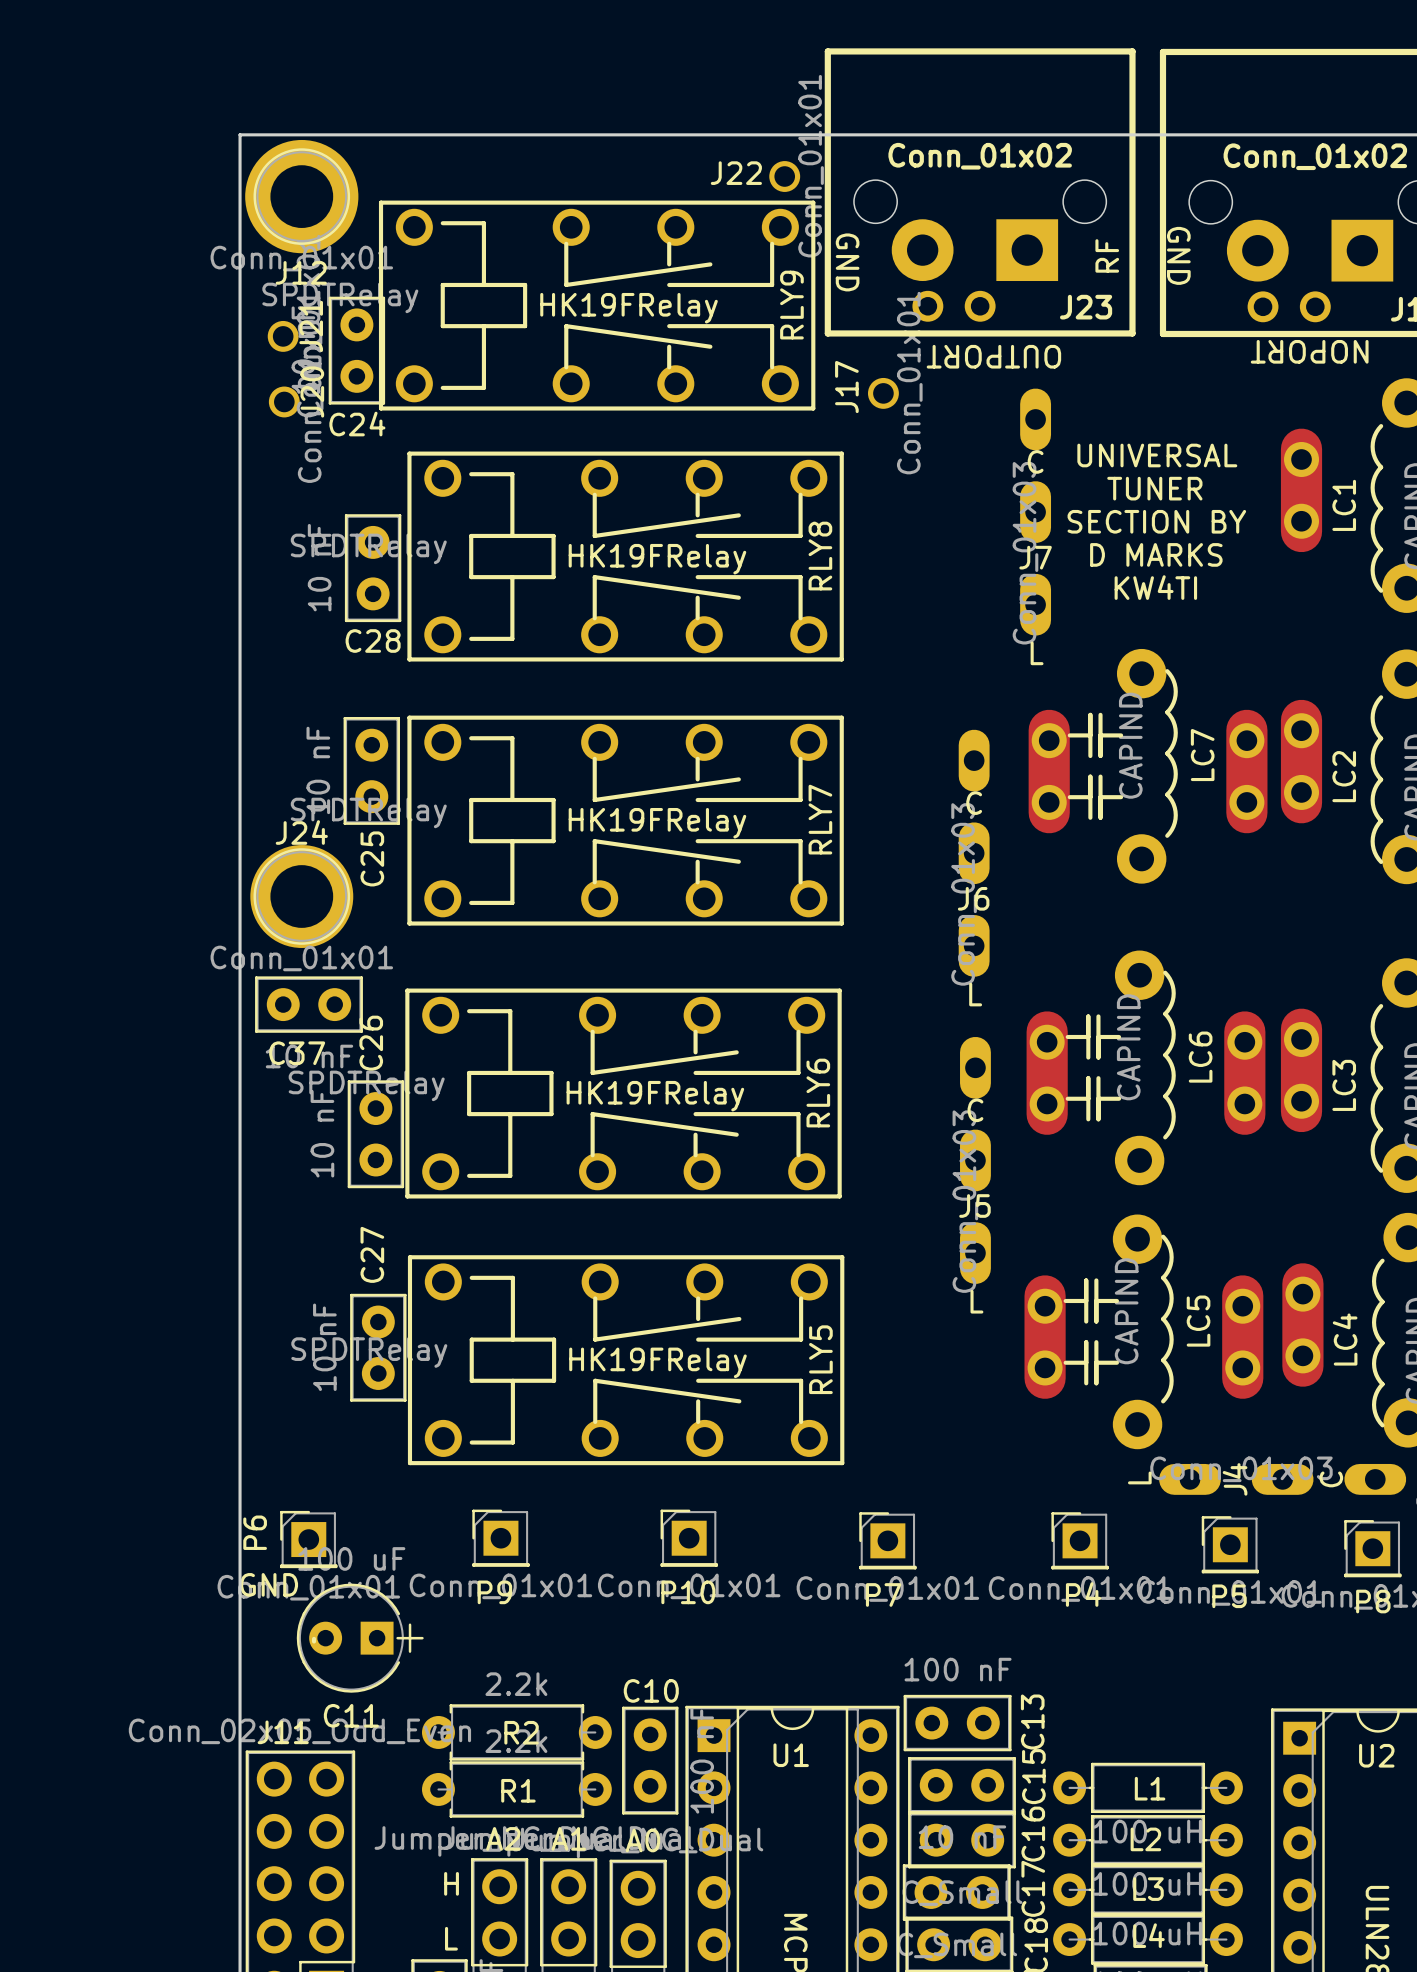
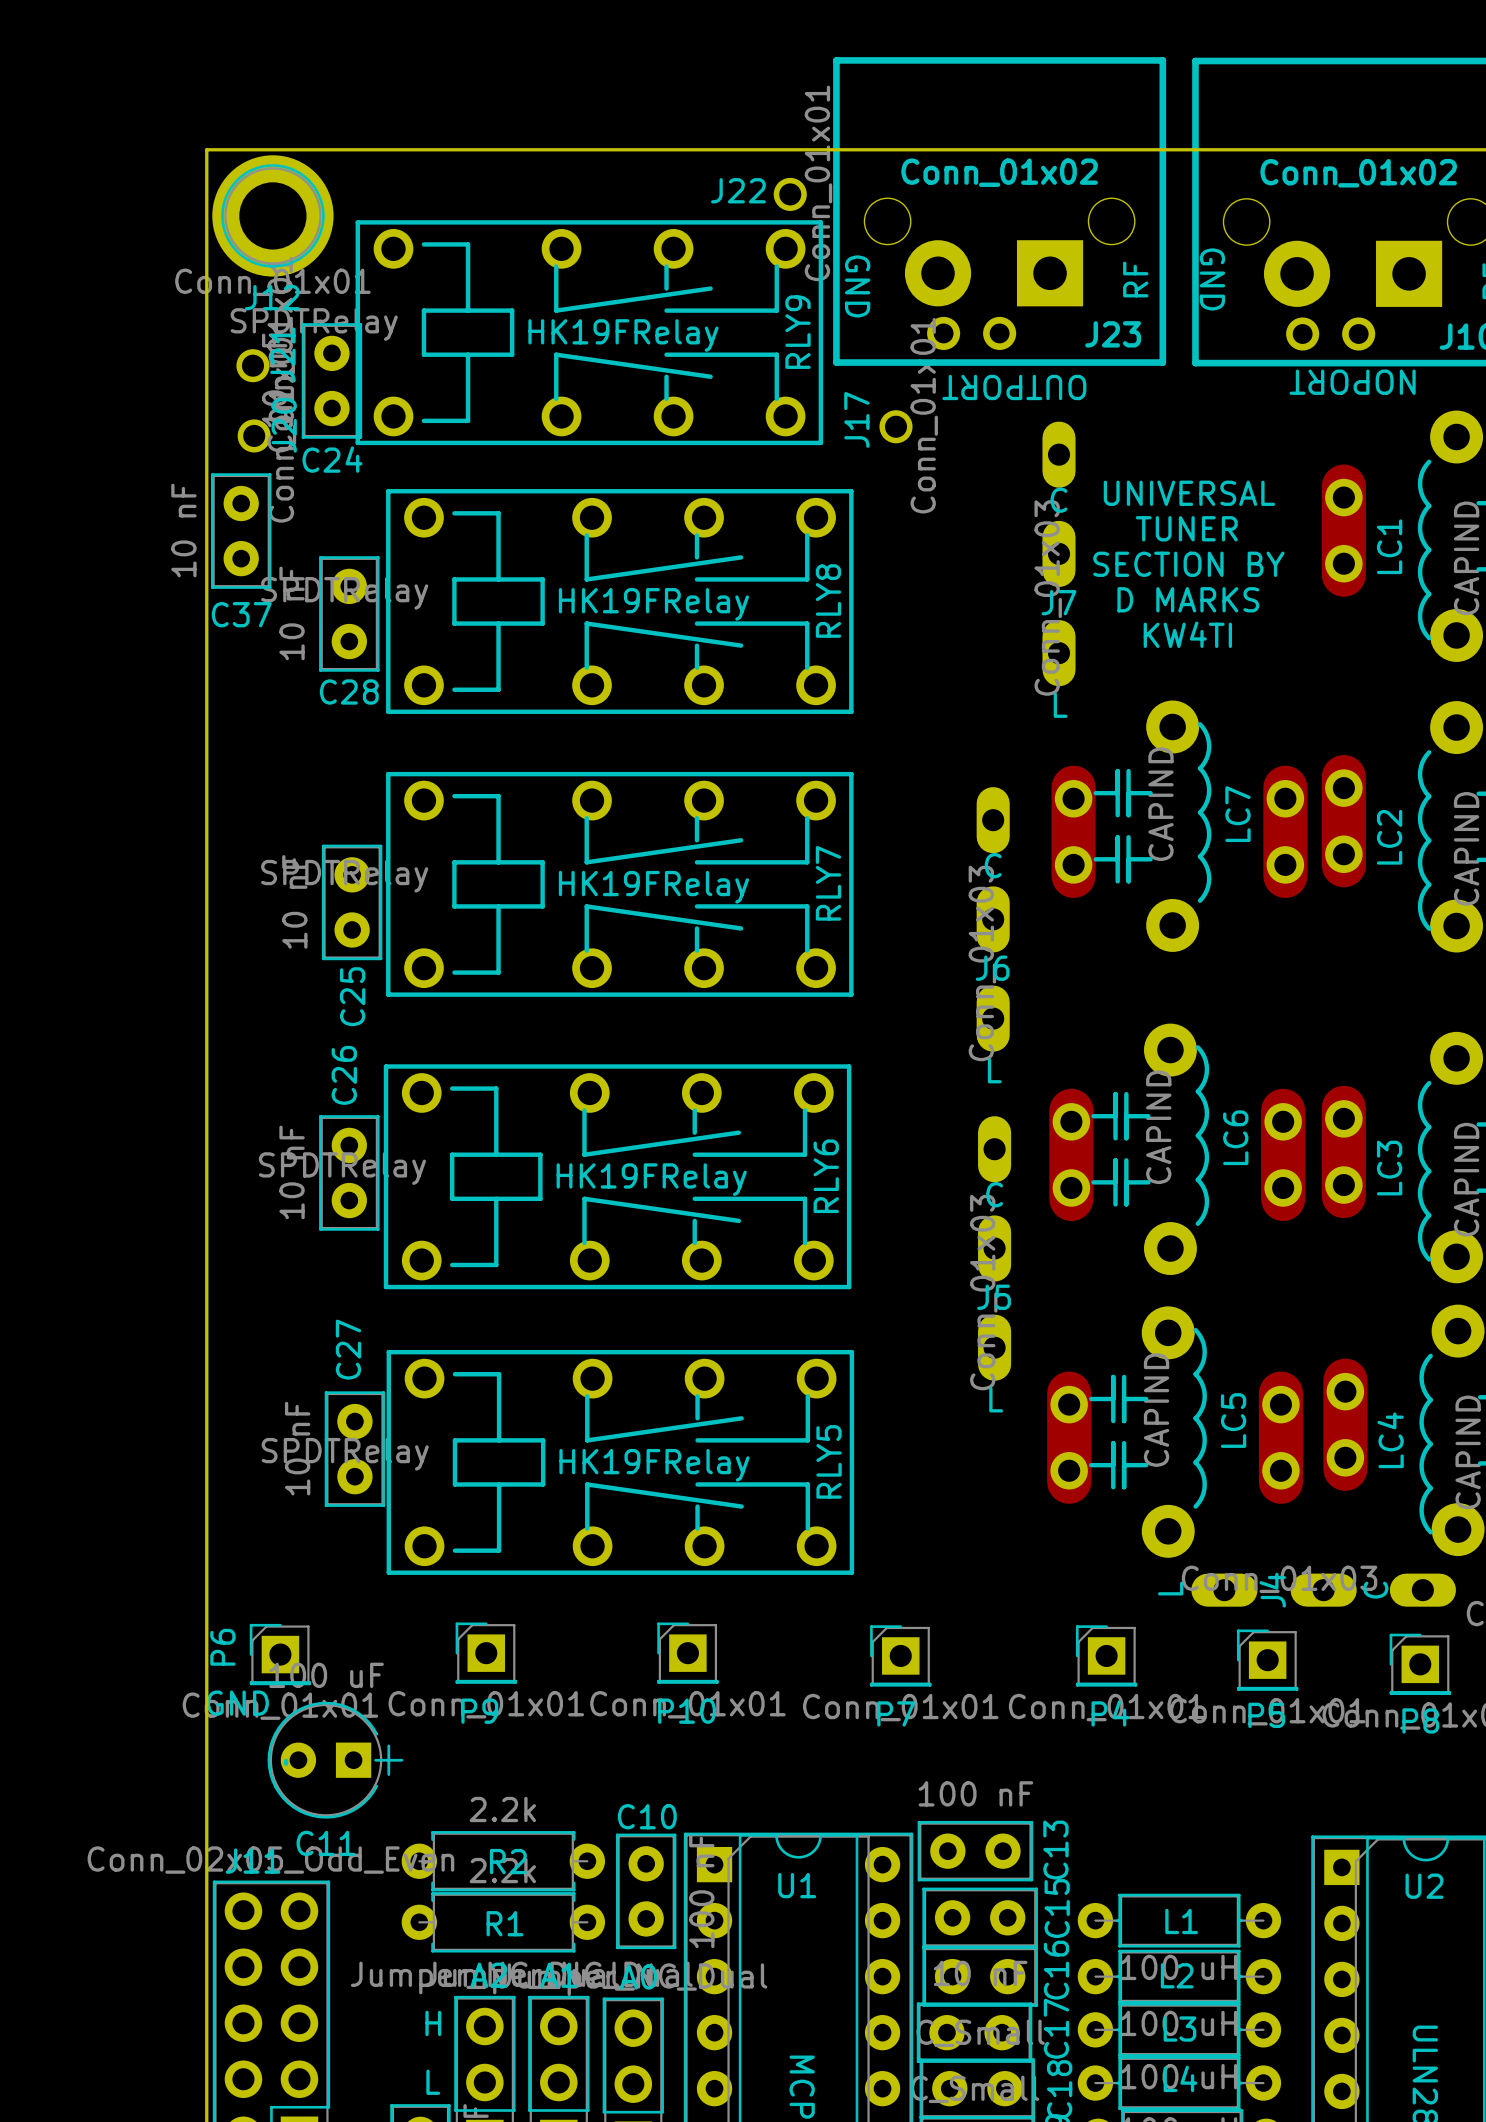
C25 position: (371, 770) -> (352, 902)
J24: Conn_01x01 (301, 896) -> none
C37 rotation: 0° (309, 1004) -> 90° clockwise (241, 531)
C37 position: (309, 1004) -> (241, 531)
C26 position: (375, 1134) -> (349, 1172)

